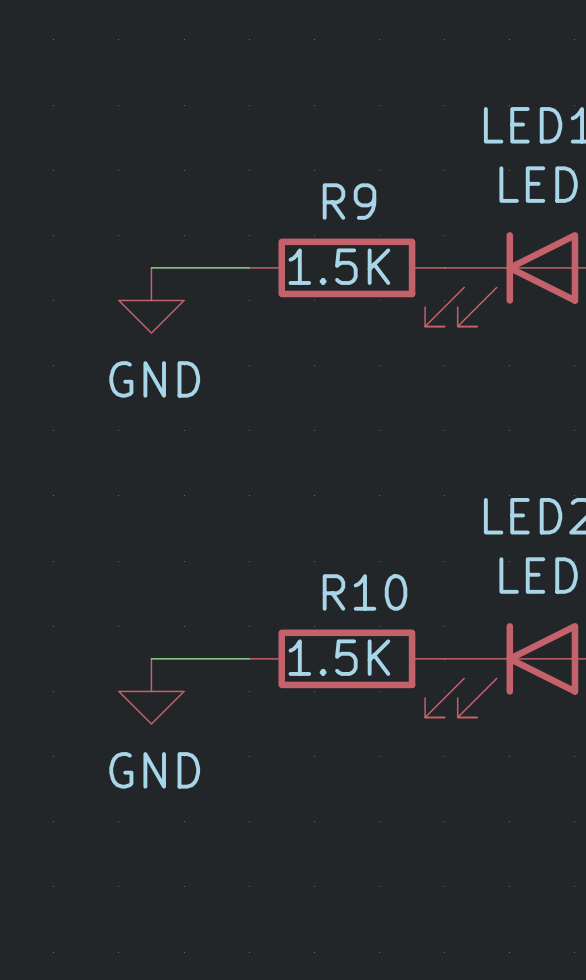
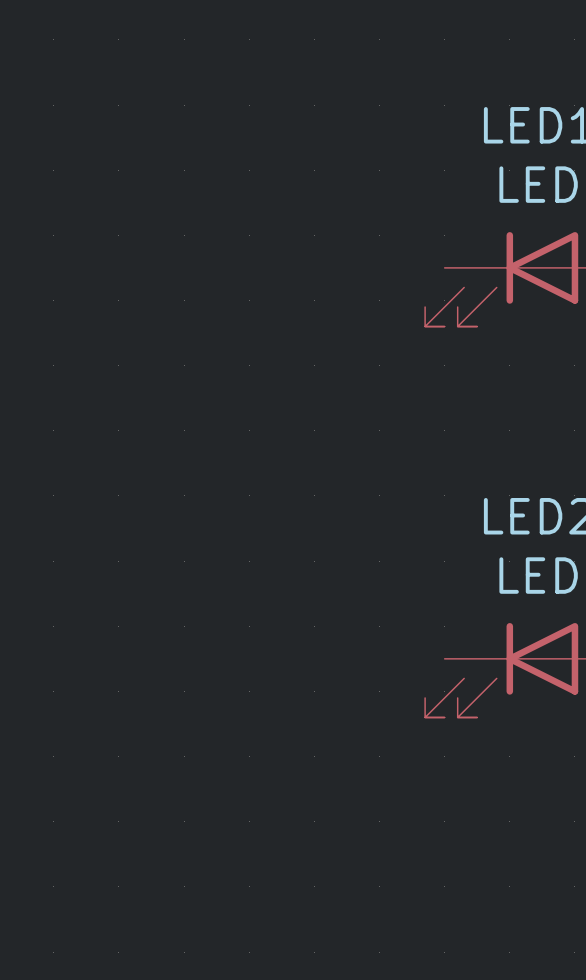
wire: (151, 267) (249, 267) -> none
R9: 1.5K (346, 267) -> none
power symbol: GND (151, 300) -> none
wire: (151, 658) (249, 658) -> none
R10: 1.5K (346, 658) -> none
power symbol: GND (151, 691) -> none

